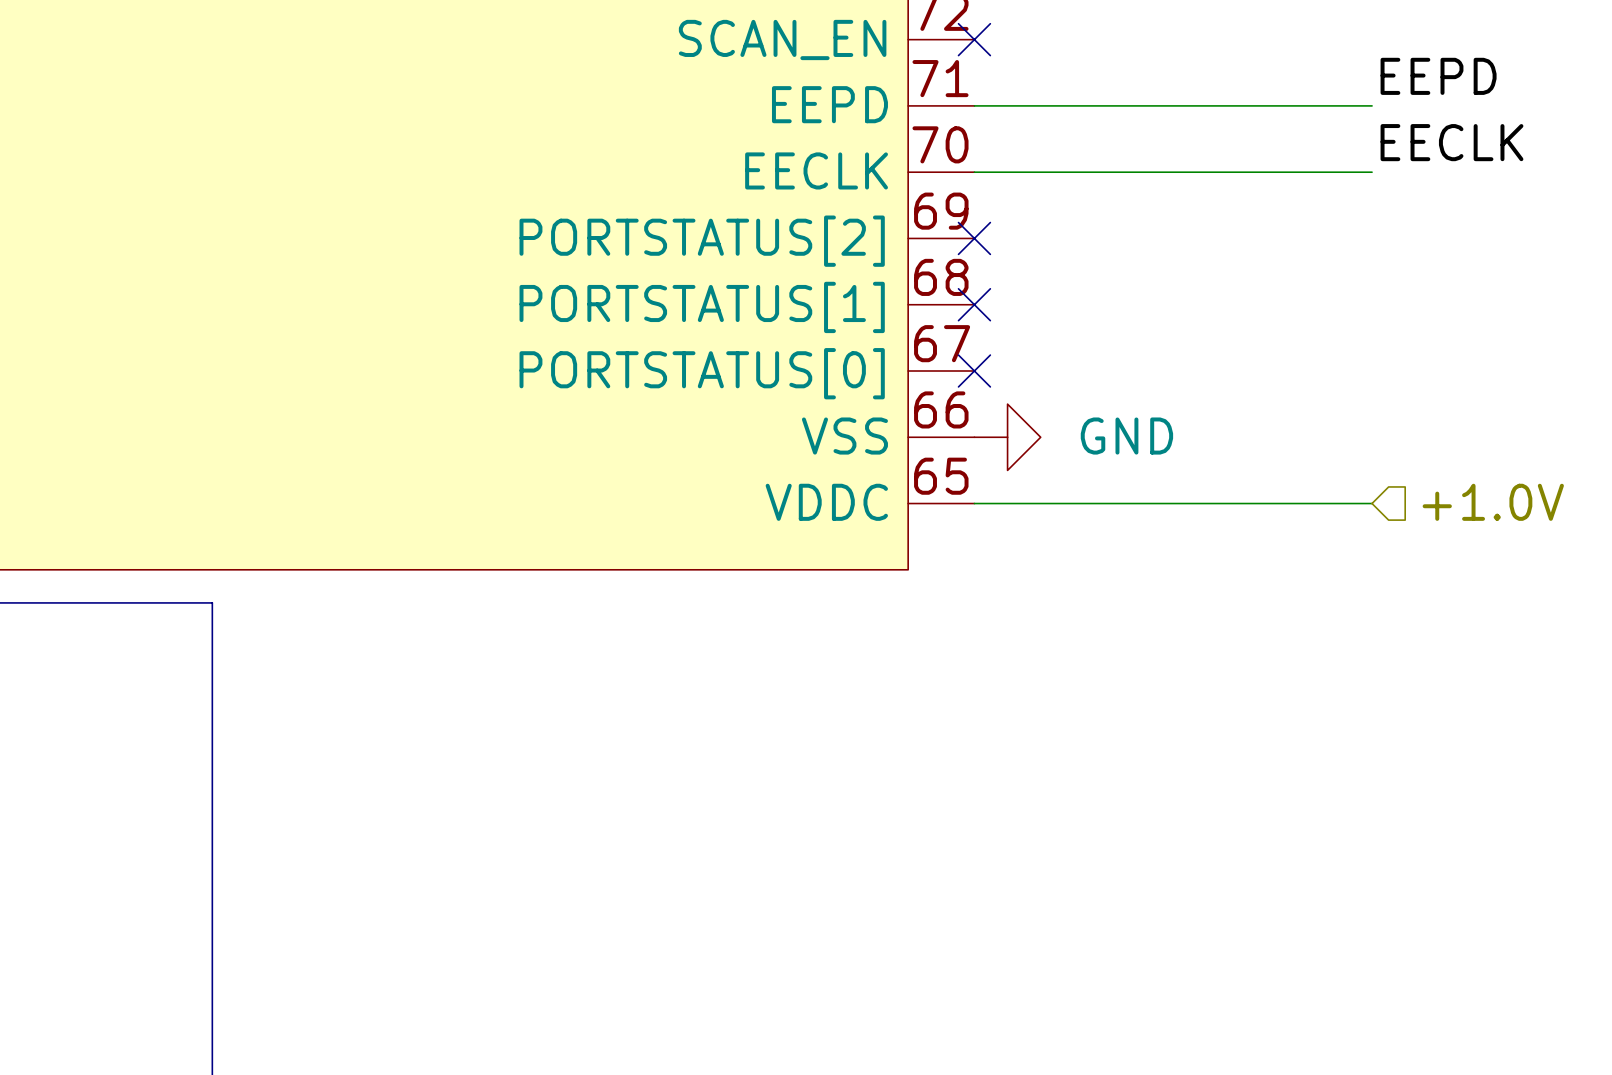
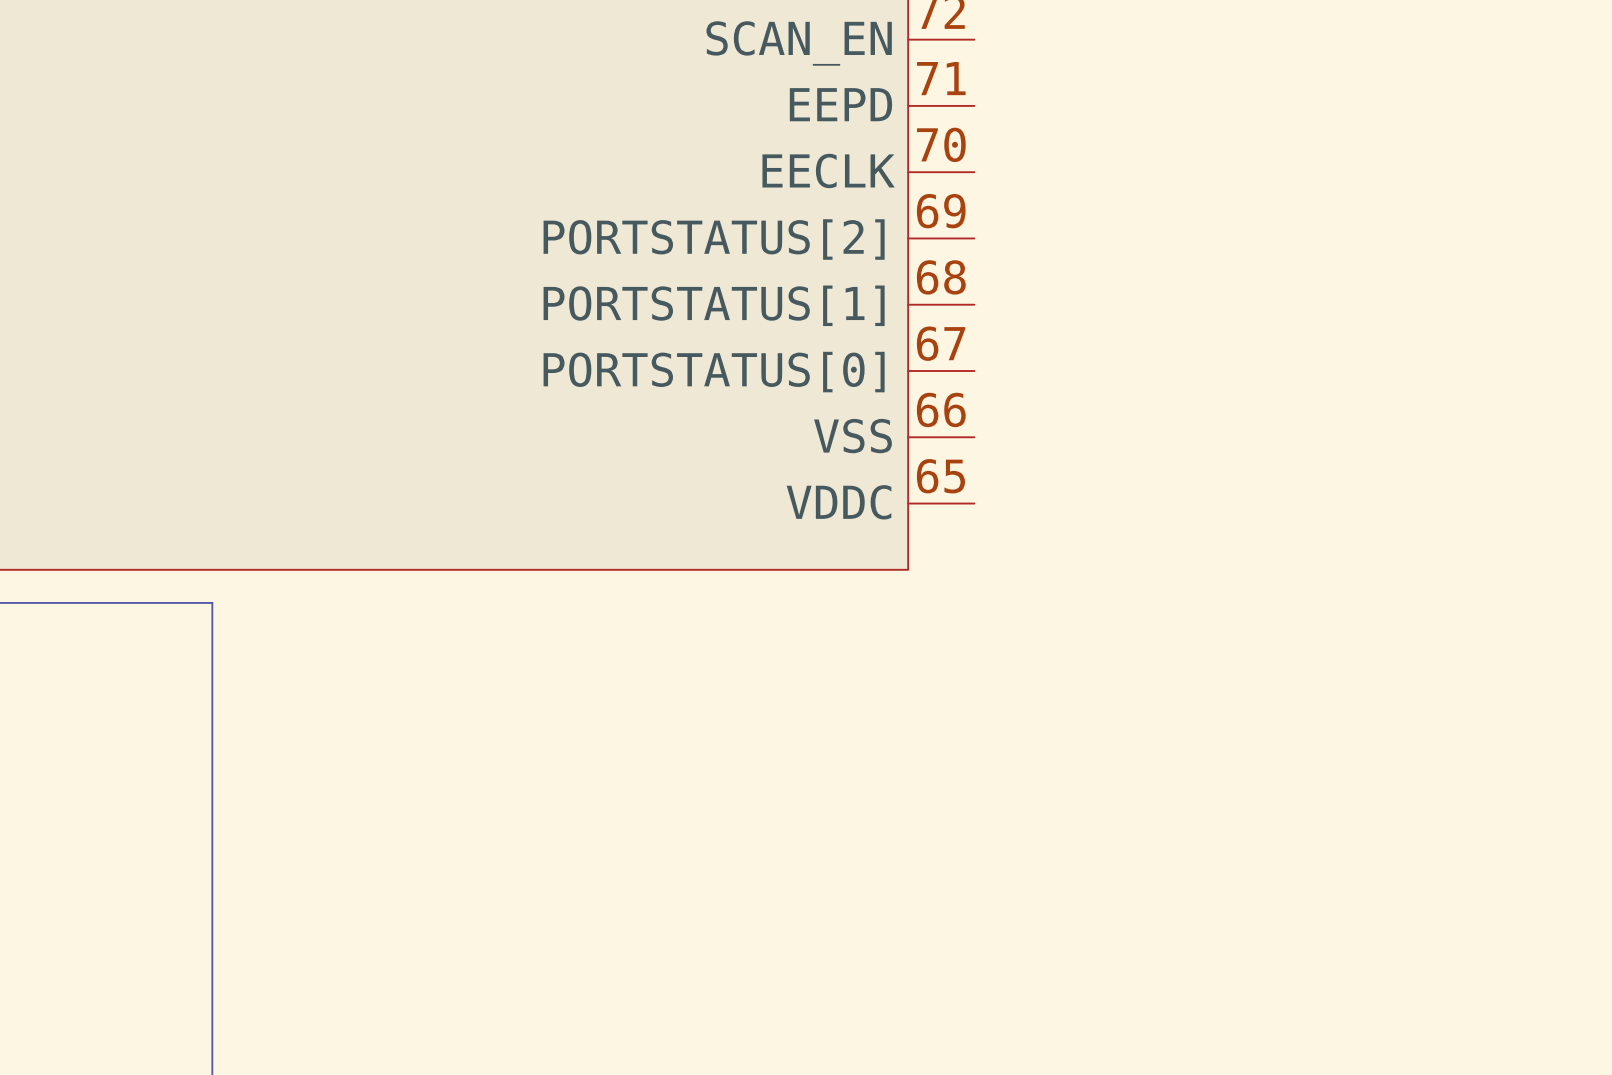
no-connect mark: (974, 39) -> none
label: EEPD (1438, 76) -> none
wire: (974, 105) (1372, 105) -> none
label: EECLK (1451, 142) -> none
wire: (974, 172) (1372, 172) -> none
no-connect mark: (974, 238) -> none
no-connect mark: (974, 304) -> none
no-connect mark: (974, 371) -> none
power symbol: GND (1007, 437) -> none
hierarchical label: +1.0V (1493, 502) -> none
wire: (974, 503) (1372, 503) -> none

